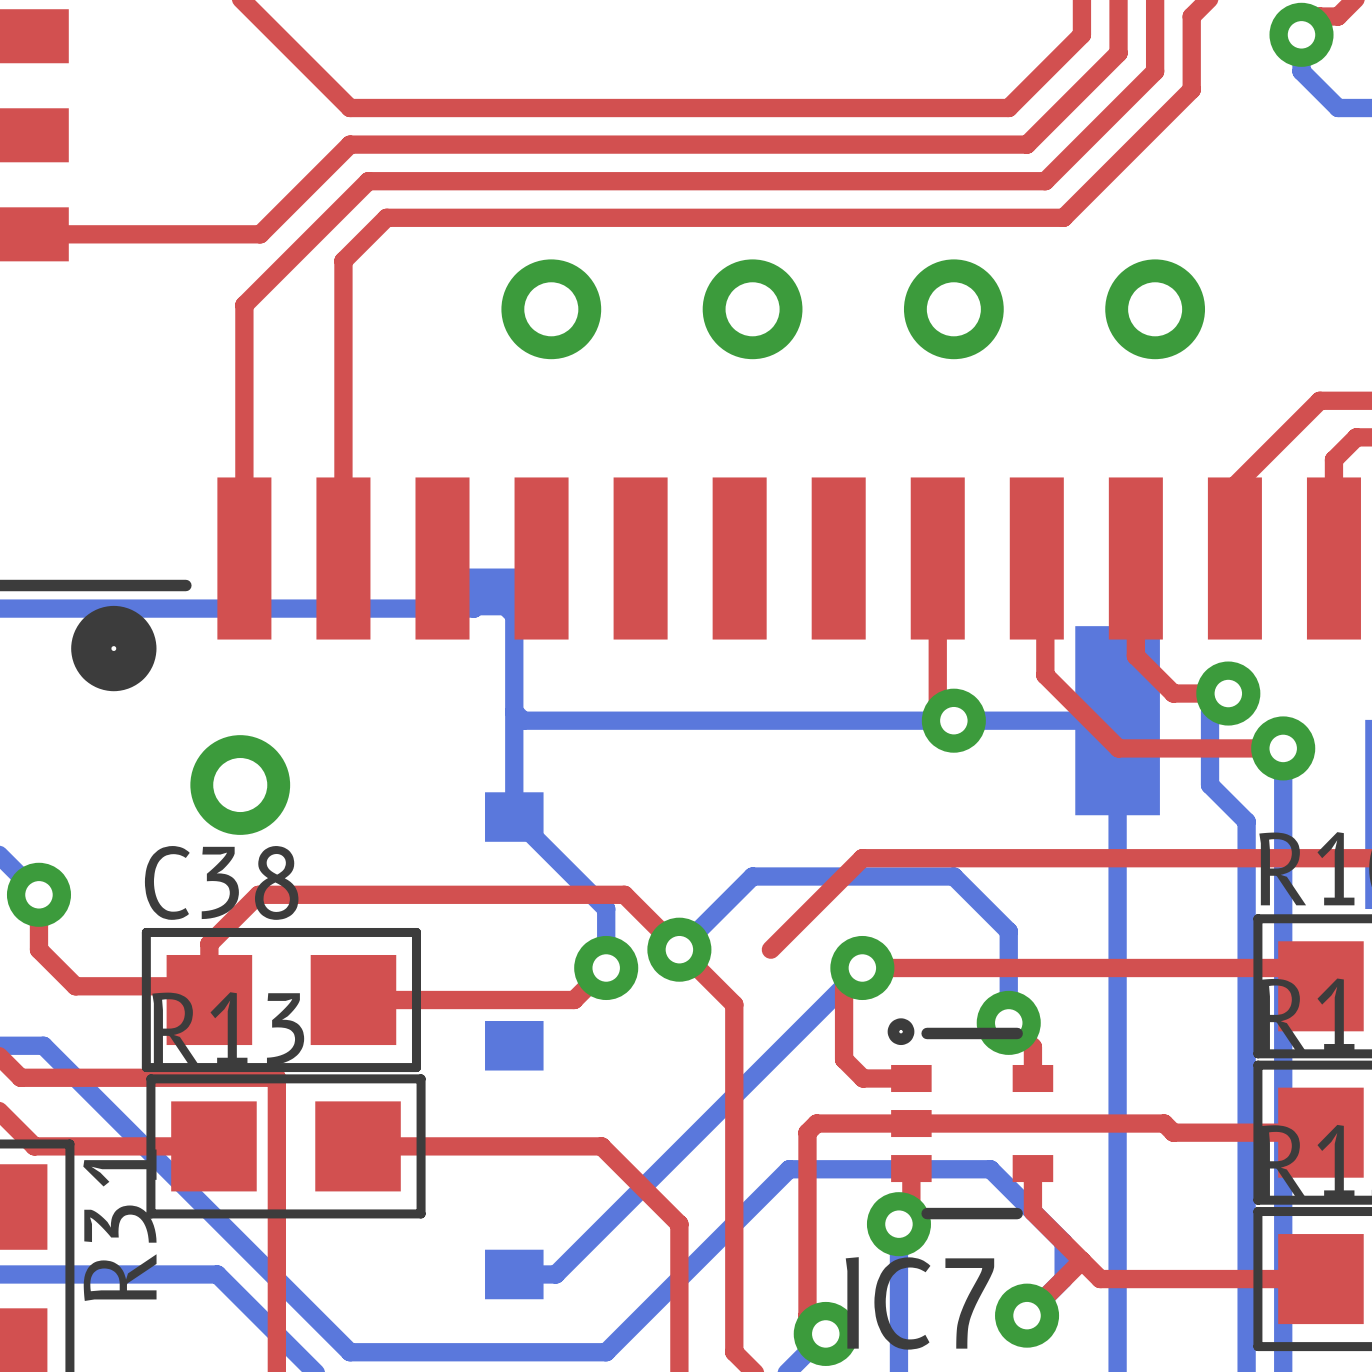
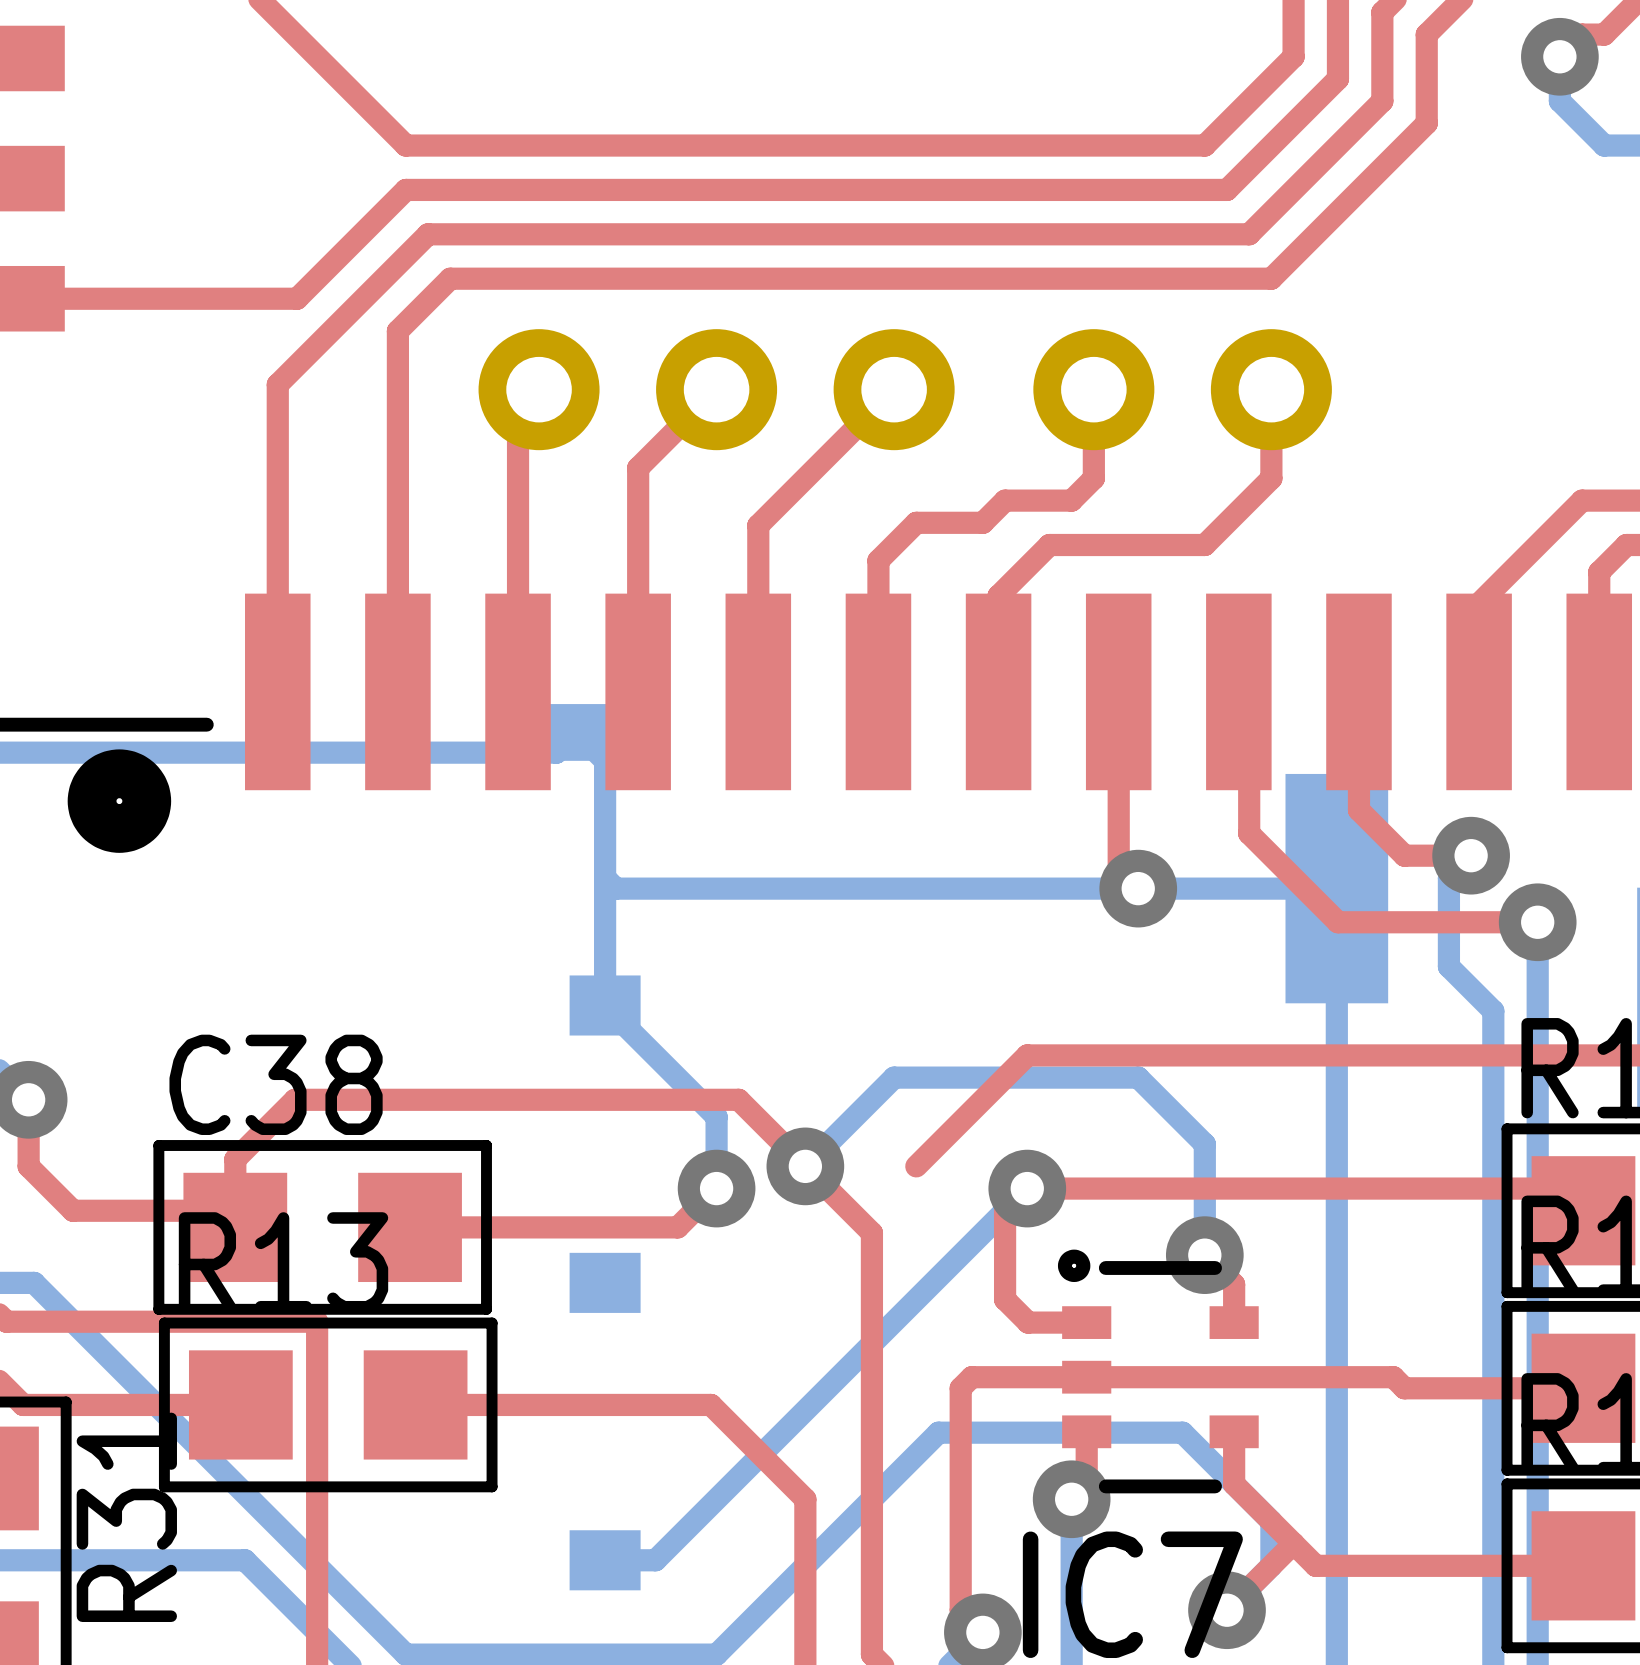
top track: none -> (539, 389) (518, 410) (518, 691)
part: none -> (539, 389)
part: (551, 309) -> none
top track: none -> (716, 389) (638, 468) (638, 691)
part: none -> (716, 389)
top track: none -> (894, 389) (758, 525) (758, 691)
top track: none -> (1093, 389) (1093, 478) (1071, 500) (1005, 500) (982, 522) (916, 522) (878, 560) (878, 691)
part position: (953, 309) -> (1093, 389)
top track: none -> (1271, 389) (1271, 478) (1204, 545) (1049, 545) (998, 595) (998, 691)
part position: (1155, 309) -> (1271, 389)
part: (240, 785) -> none

